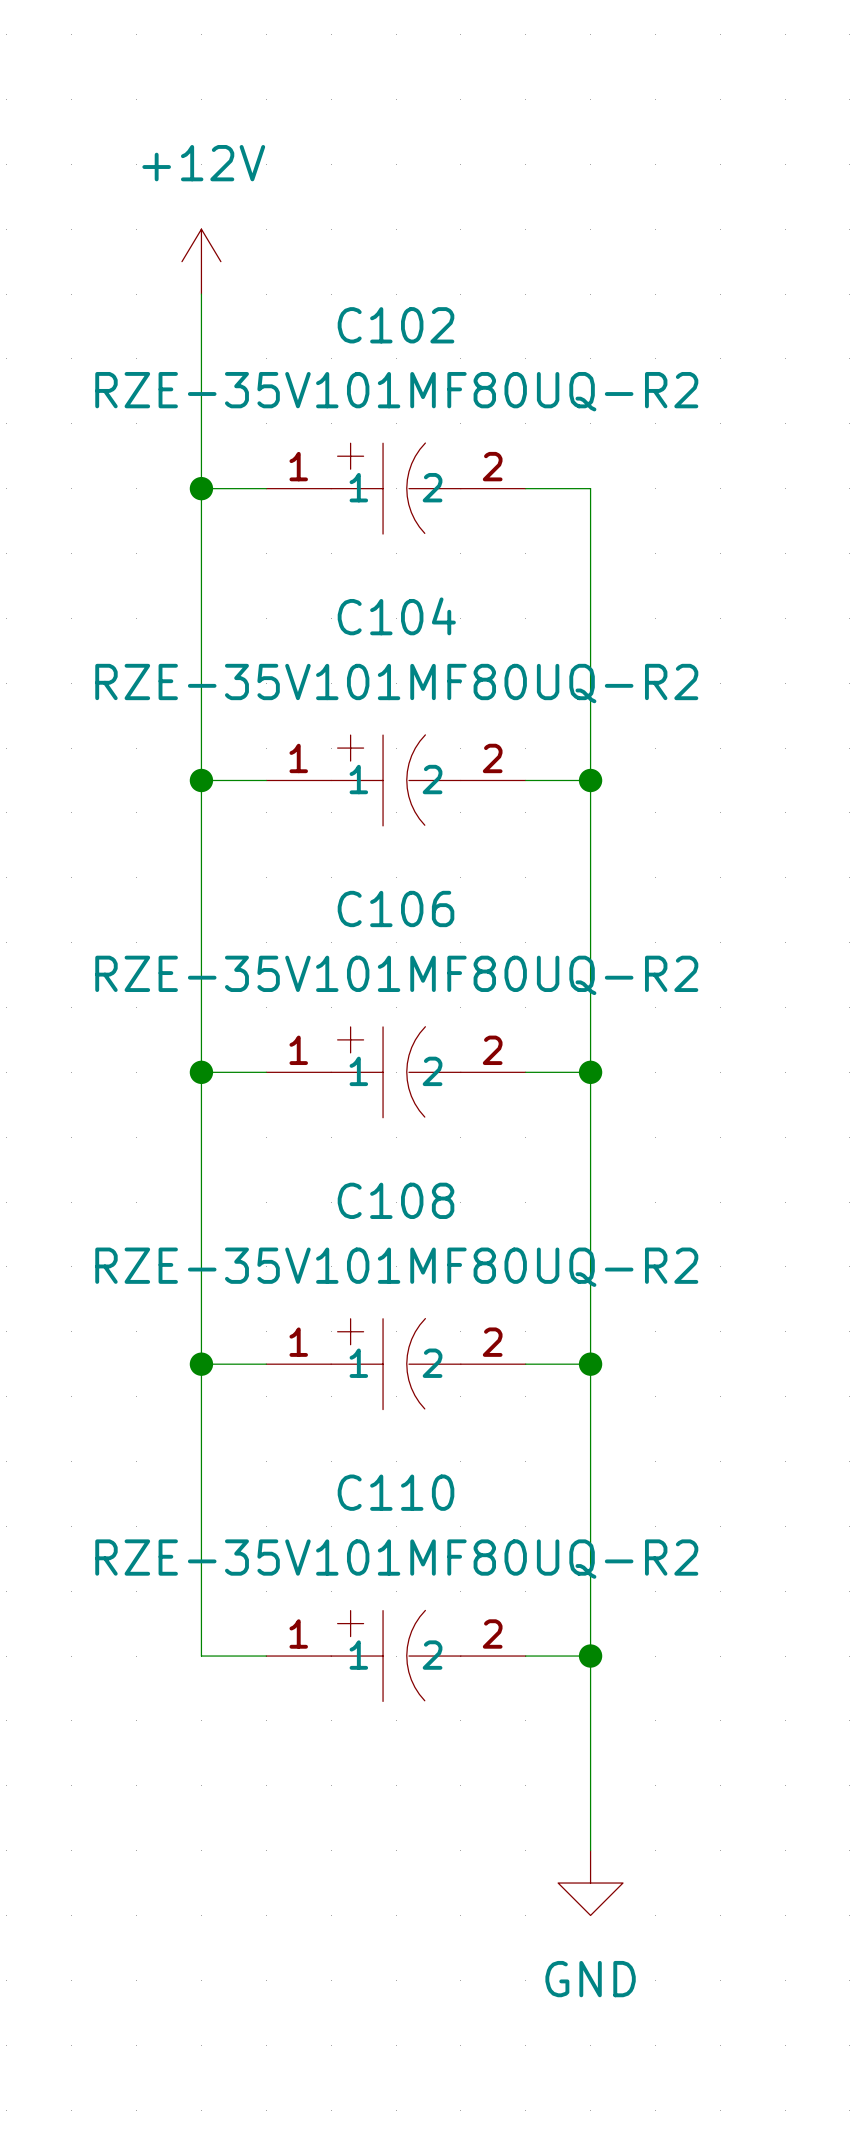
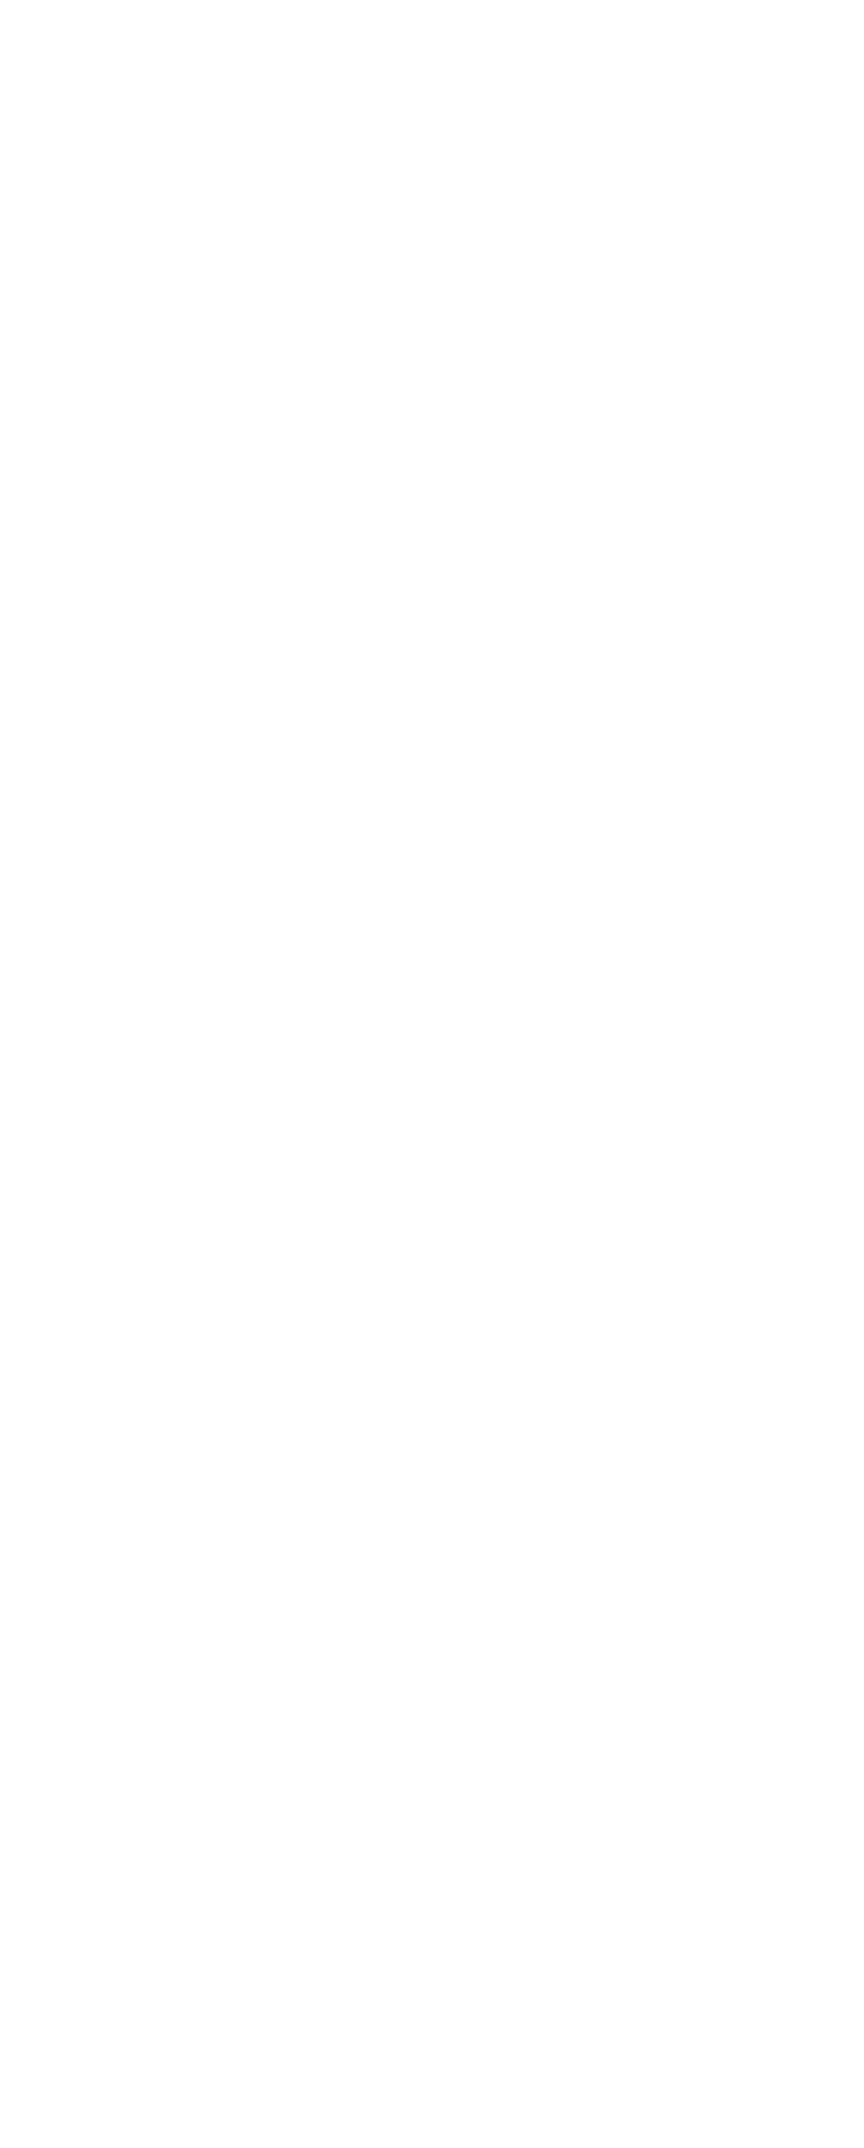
power symbol: +12V (201, 261) -> none
wire: (201, 294) (201, 1656) (266, 1656) -> none
wire: (201, 488) (266, 488) -> none
junction: (201, 488) -> none
C102: RZE-35V101MF80UQ-R2 (396, 488) -> none
wire: (525, 488) (590, 488) (590, 1850) -> none
wire: (201, 780) (266, 780) -> none
junction: (201, 780) -> none
C104: RZE-35V101MF80UQ-R2 (396, 780) -> none
wire: (525, 780) (590, 780) -> none
junction: (590, 780) -> none
wire: (201, 1072) (266, 1072) -> none
junction: (201, 1072) -> none
C106: RZE-35V101MF80UQ-R2 (396, 1072) -> none
wire: (525, 1072) (590, 1072) -> none
junction: (590, 1072) -> none
wire: (201, 1364) (266, 1364) -> none
junction: (201, 1364) -> none
C108: RZE-35V101MF80UQ-R2 (396, 1364) -> none
wire: (525, 1364) (590, 1364) -> none
junction: (590, 1364) -> none
C110: RZE-35V101MF80UQ-R2 (396, 1655) -> none
wire: (525, 1656) (590, 1656) -> none
junction: (590, 1656) -> none
power symbol: GND (590, 1883) -> none

